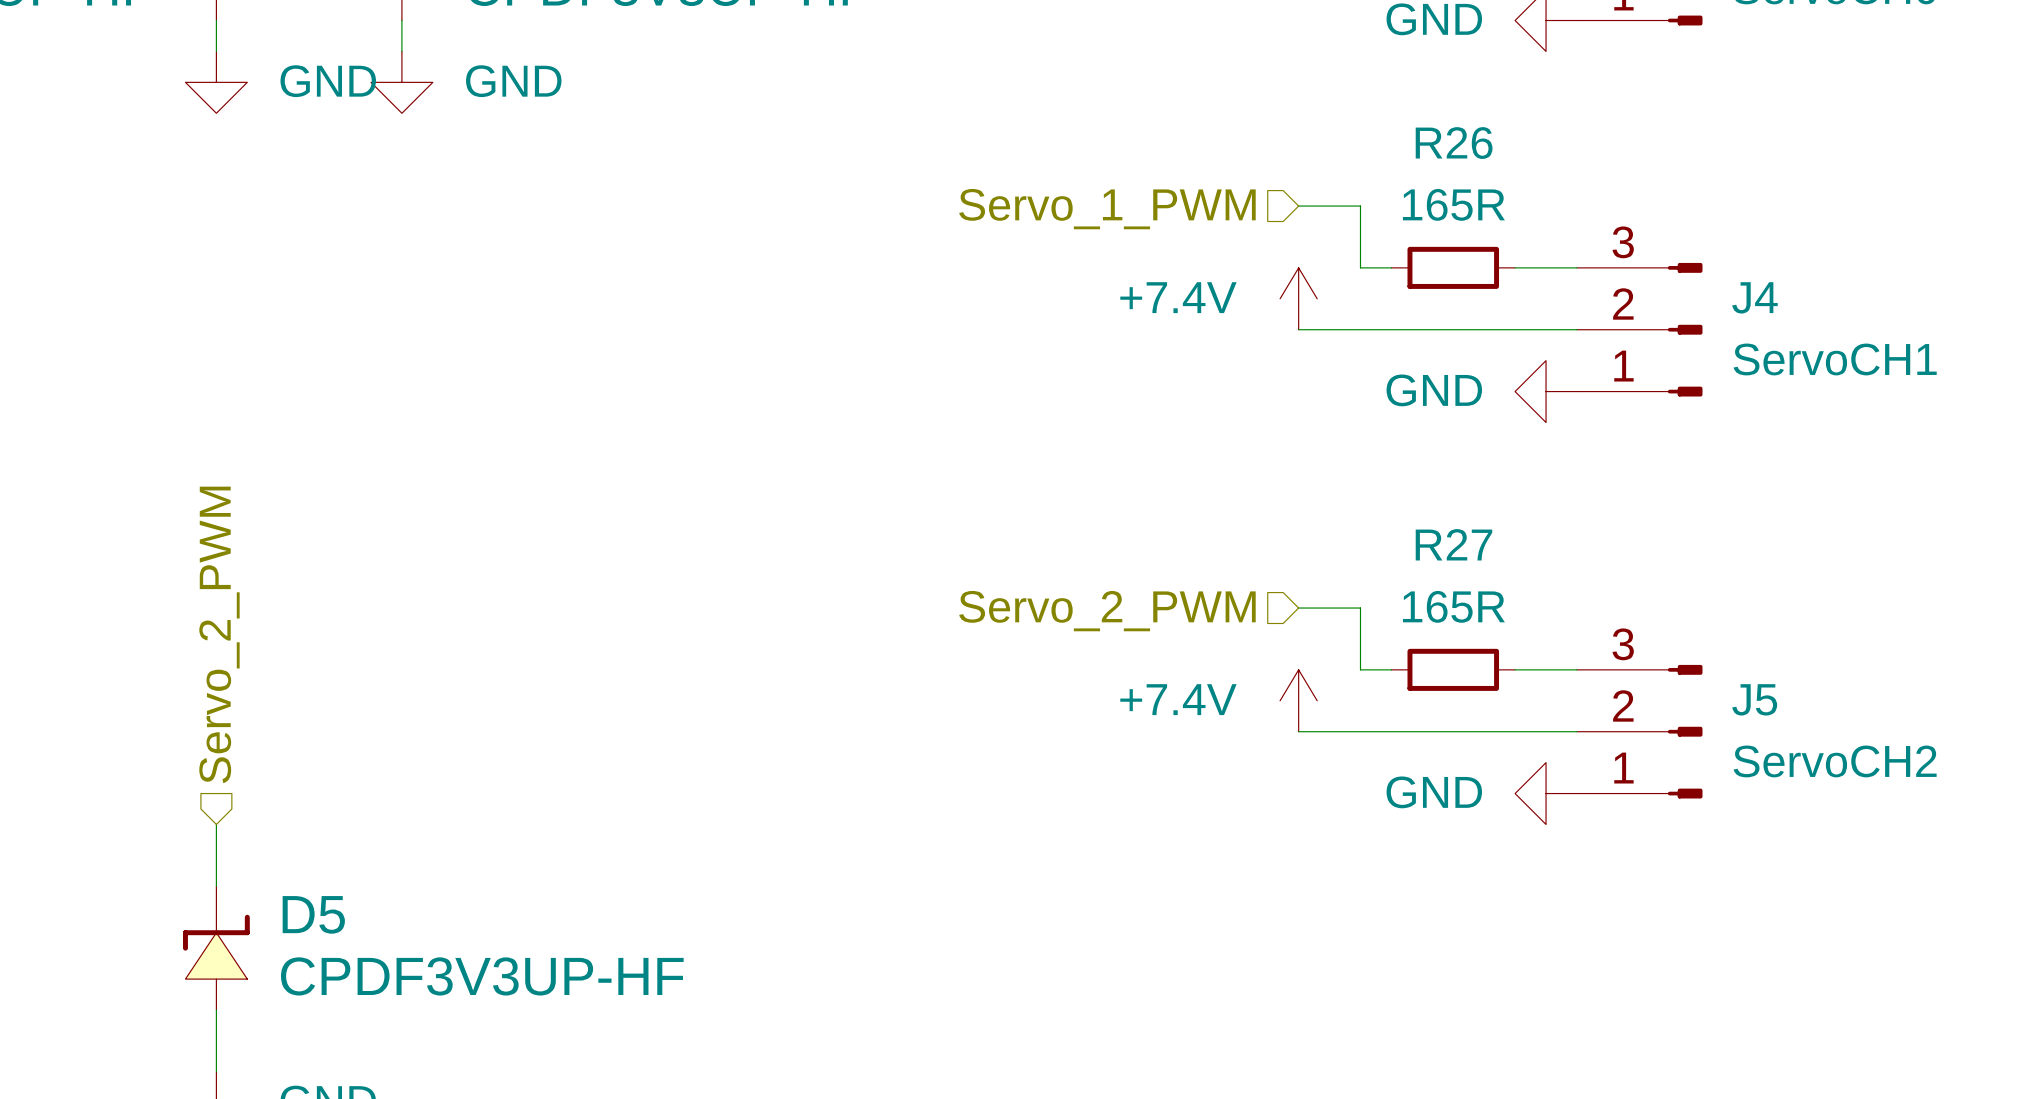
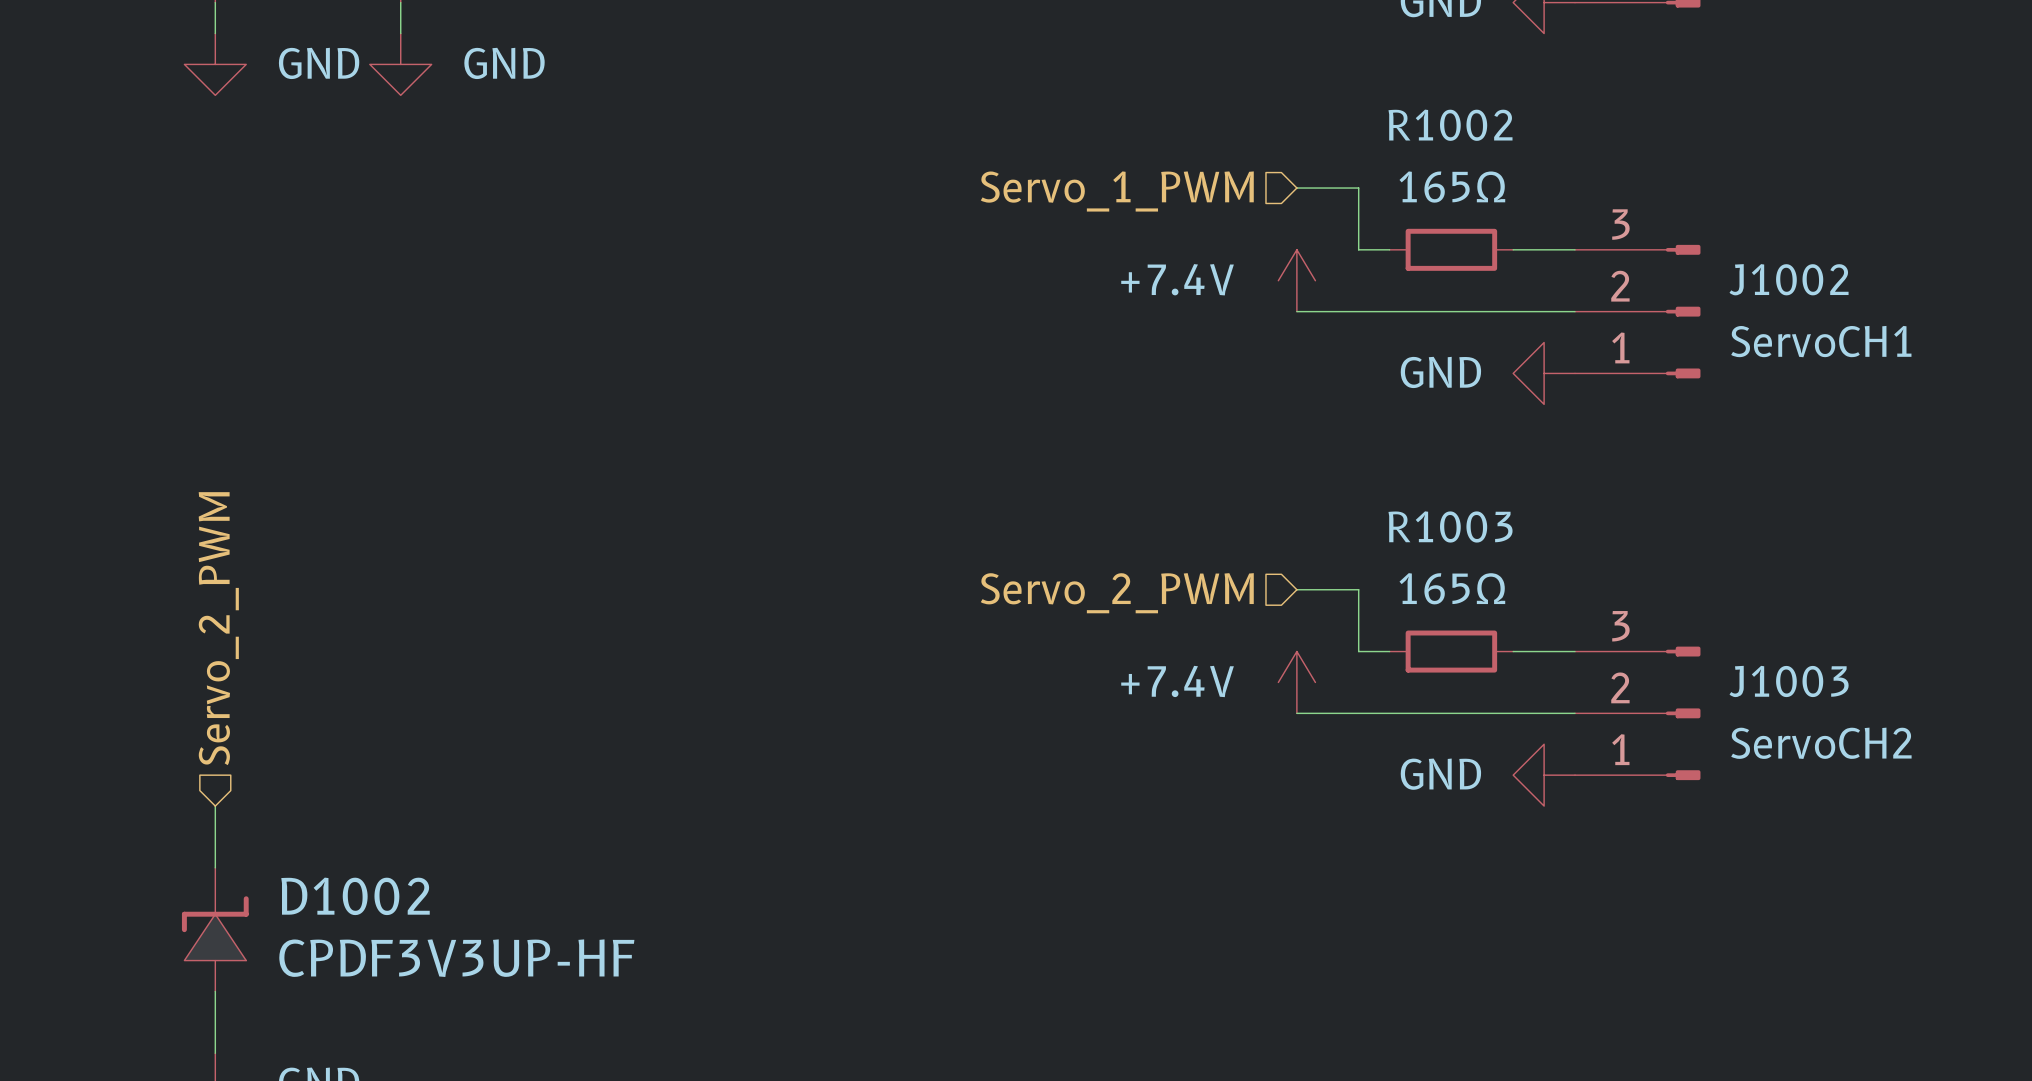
R26 name: R26 (1454, 143) -> R1002 (1450, 125)
R26 value: 165R (1453, 204) -> 165Ω (1452, 187)
J4 name: J4 (1754, 297) -> J1002 (1789, 279)
R27 name: R27 (1453, 544) -> R1003 (1450, 526)
R27 value: 165R (1453, 606) -> 165Ω (1452, 588)
J5 name: J5 (1754, 699) -> J1003 (1789, 681)
D5 name: D5 (313, 914) -> D1002 (355, 896)

